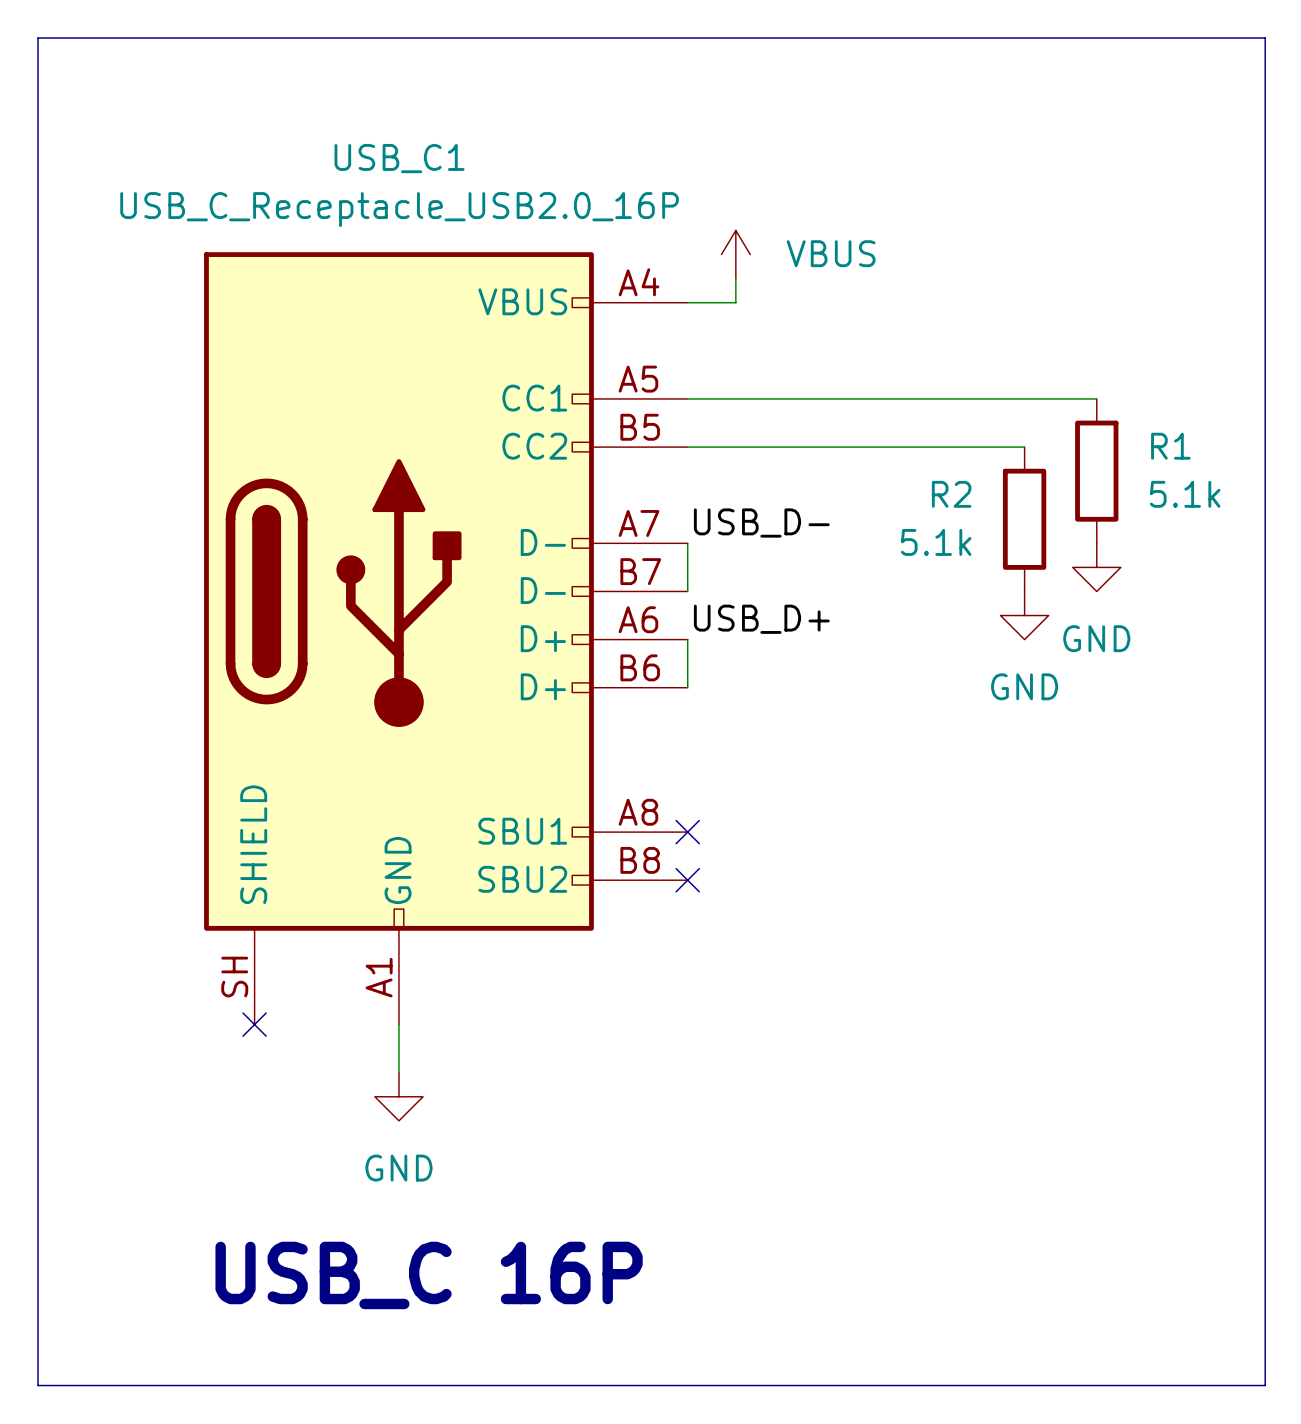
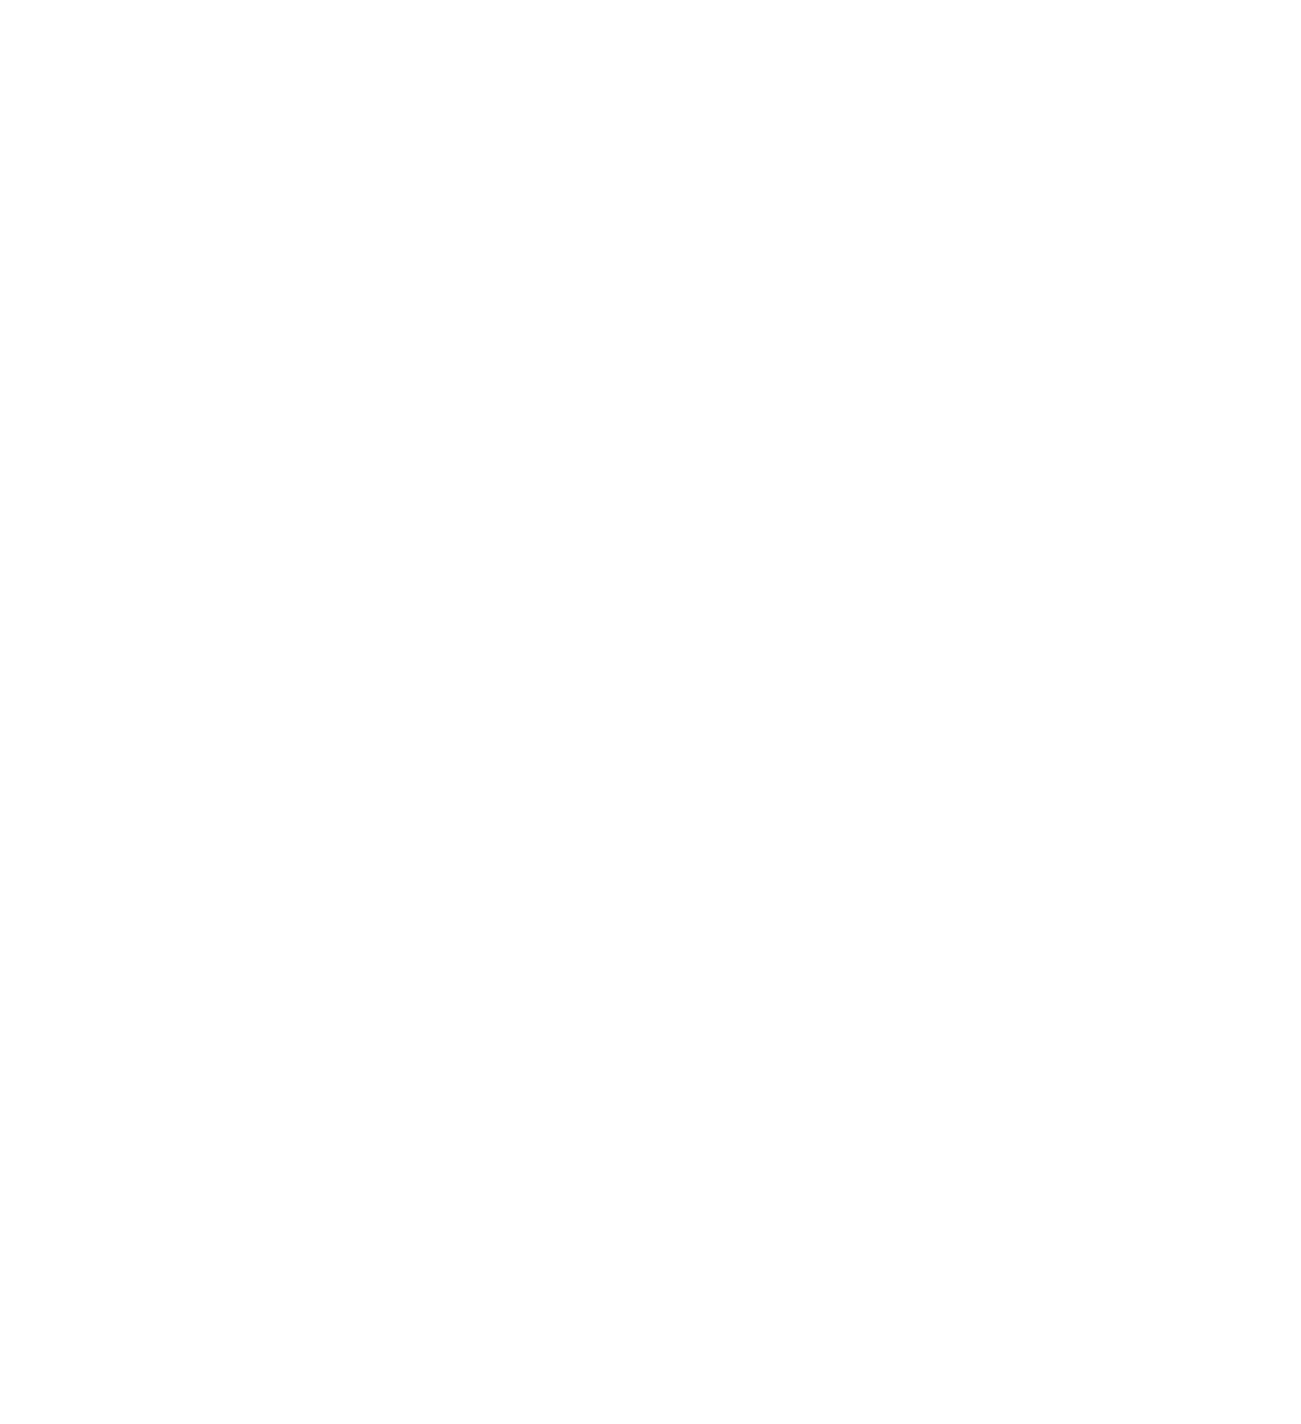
line: (38, 38) (1265, 38) (1265, 1385) (38, 1385) (38, 38) -> none
power symbol: VBUS (735, 254) -> none
wire: (735, 278) (735, 302) (687, 302) -> none
wire: (687, 398) (1096, 398) -> none
wire: (687, 447) (1024, 447) -> none
R1: 5.1k (1096, 471) -> none
R2: 5.1k (1024, 519) -> none
label: USB_D- (761, 523) -> none
wire: (687, 543) (687, 591) -> none
power symbol: GND (1096, 567) -> none
power symbol: GND (1024, 615) -> none
label: USB_D+ (761, 619) -> none
USB_C1: USB_C_Receptacle_USB2.0_16P (445, 638) -> none
wire: (687, 639) (687, 687) -> none
no-connect mark: (687, 832) -> none
no-connect mark: (687, 880) -> none
no-connect mark: (254, 1024) -> none
wire: (398, 1024) (398, 1072) -> none
power symbol: GND (398, 1096) -> none
text: USB_C 16P (429, 1275) -> none

